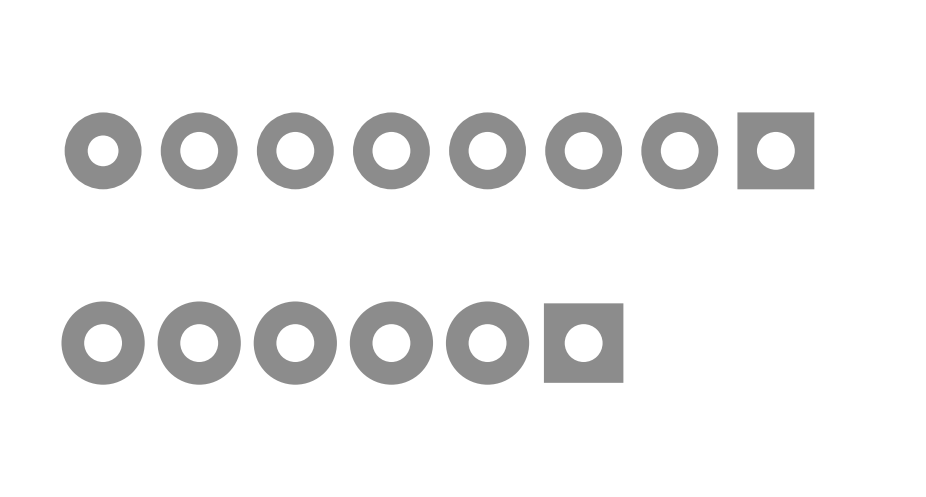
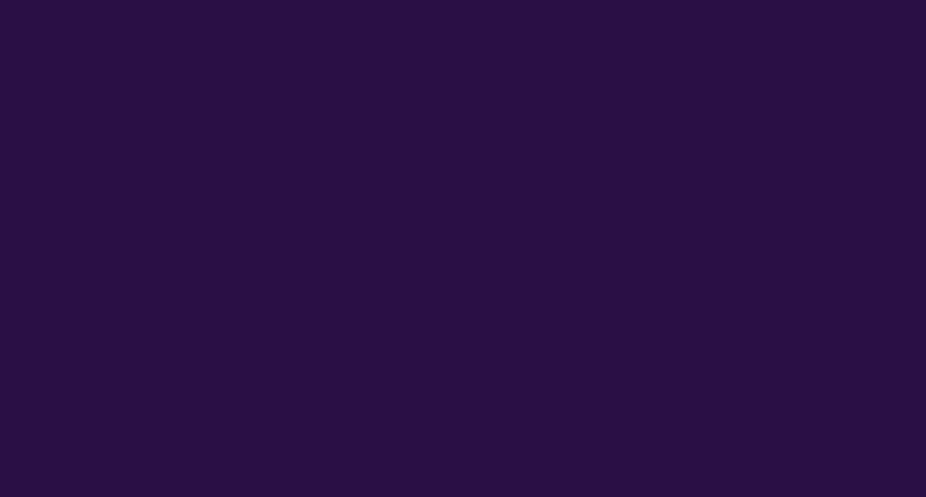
part: (439, 150) -> none
part: (342, 343) -> none

